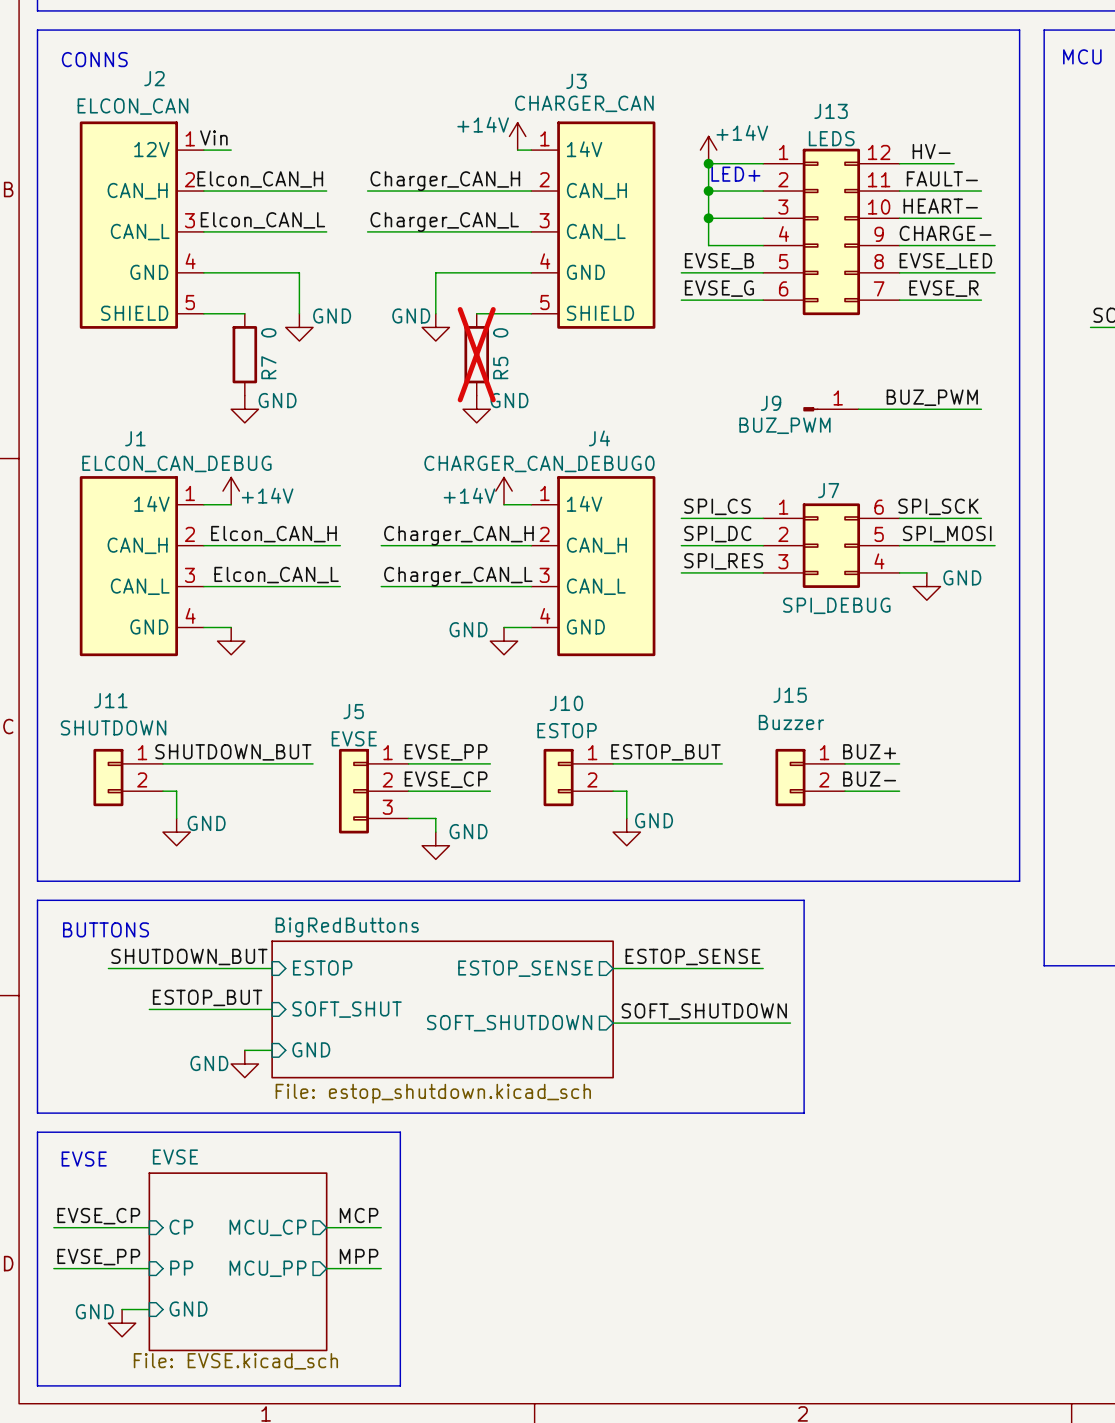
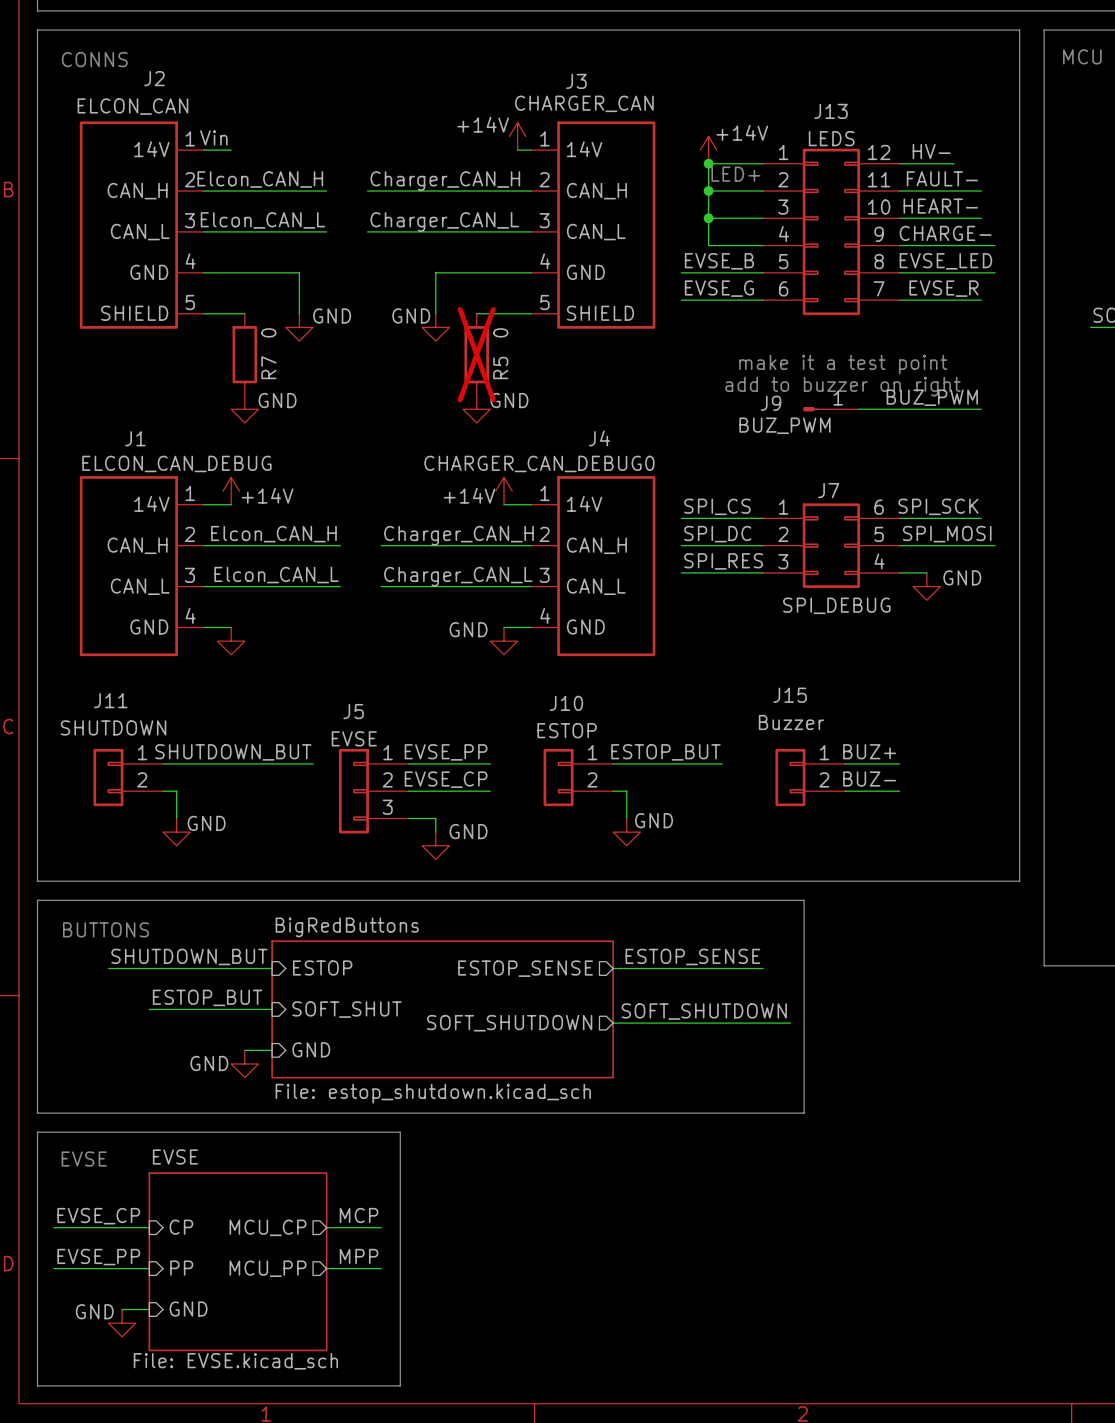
J2 pin name: 12V (151, 149) -> 14V (151, 149)
text: none -> make it a test point (843, 364)
text: none -> add to buzzer on right (842, 386)

